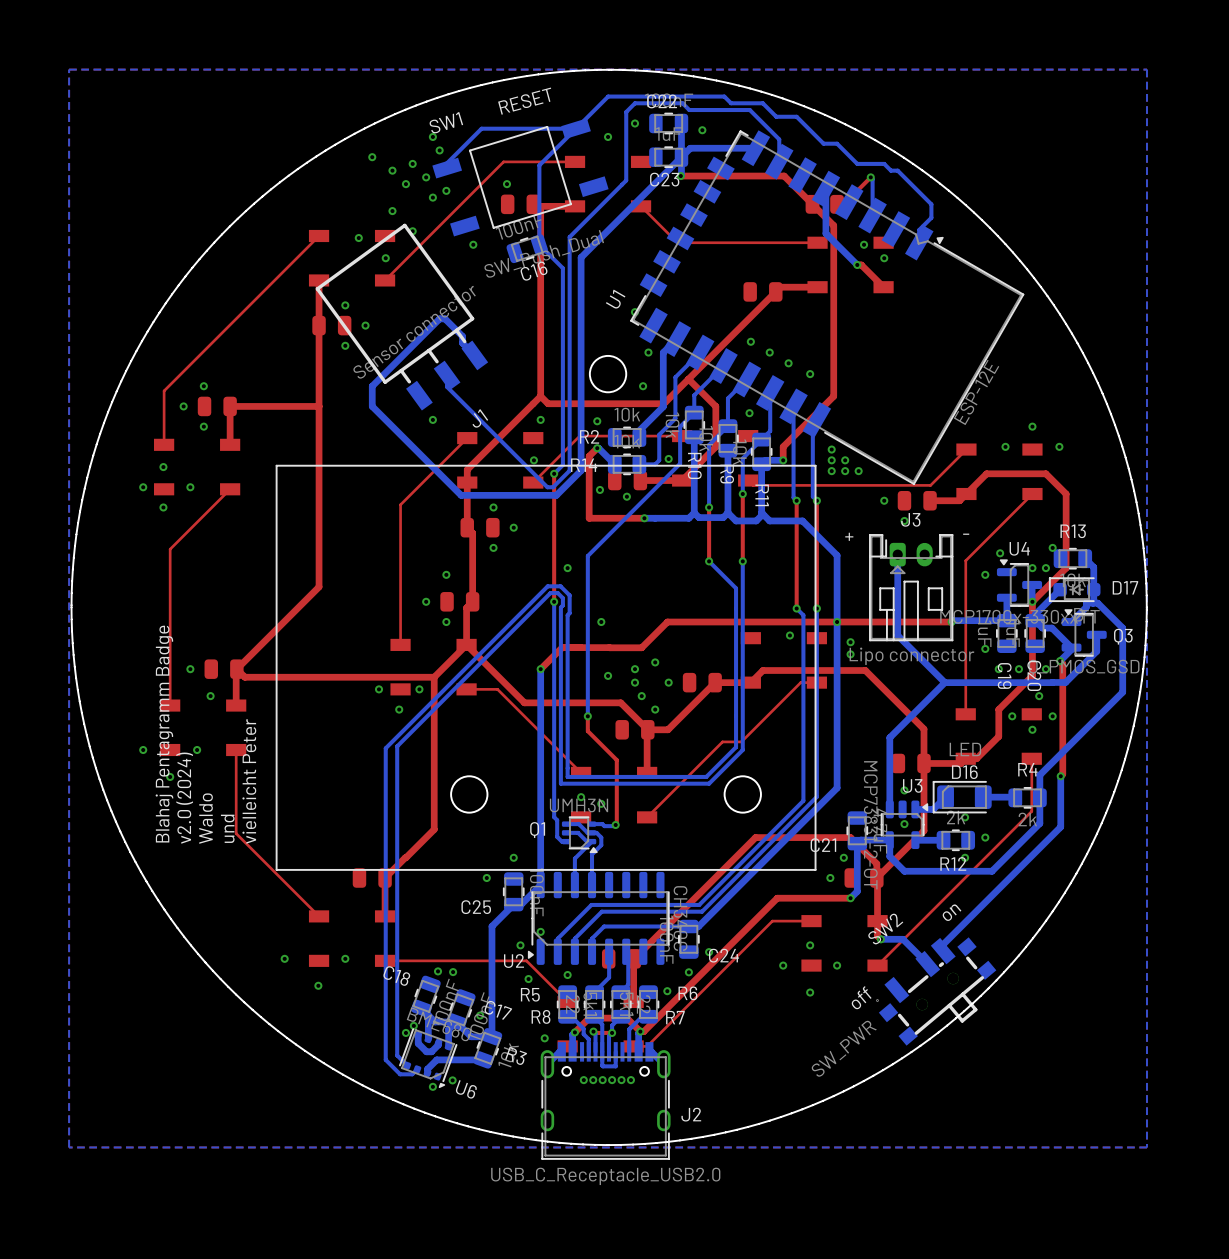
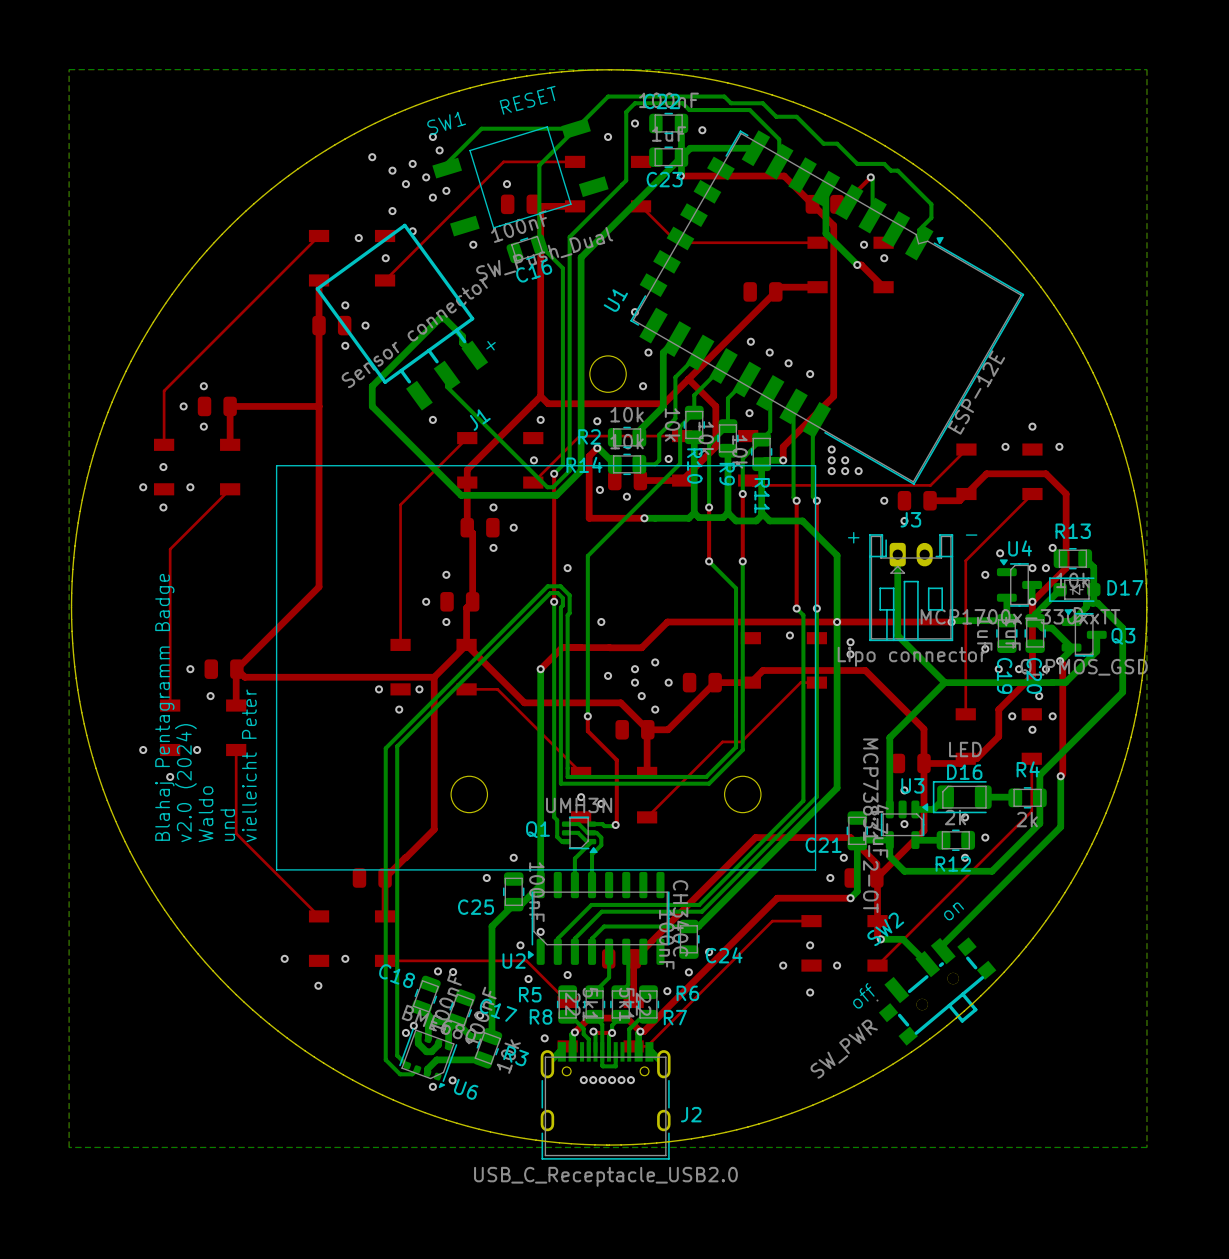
text: none -> + (491, 345)

